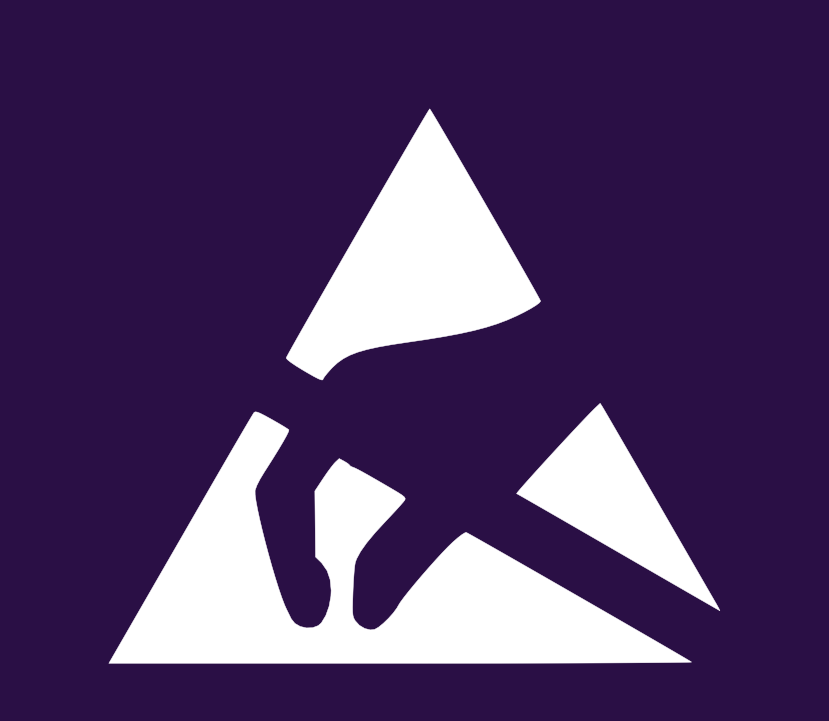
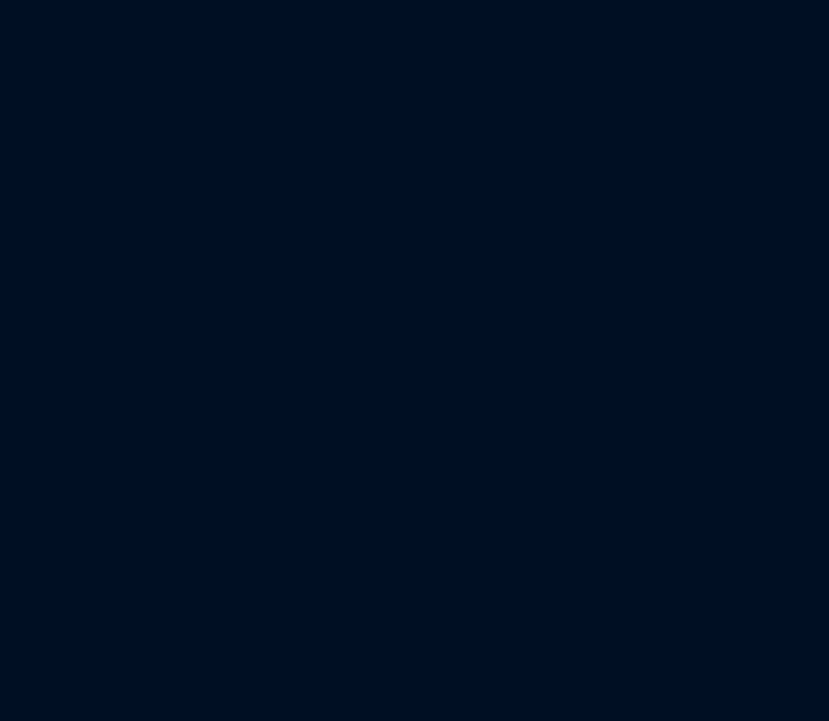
drawing: [108, 108, 721, 664] -> none

